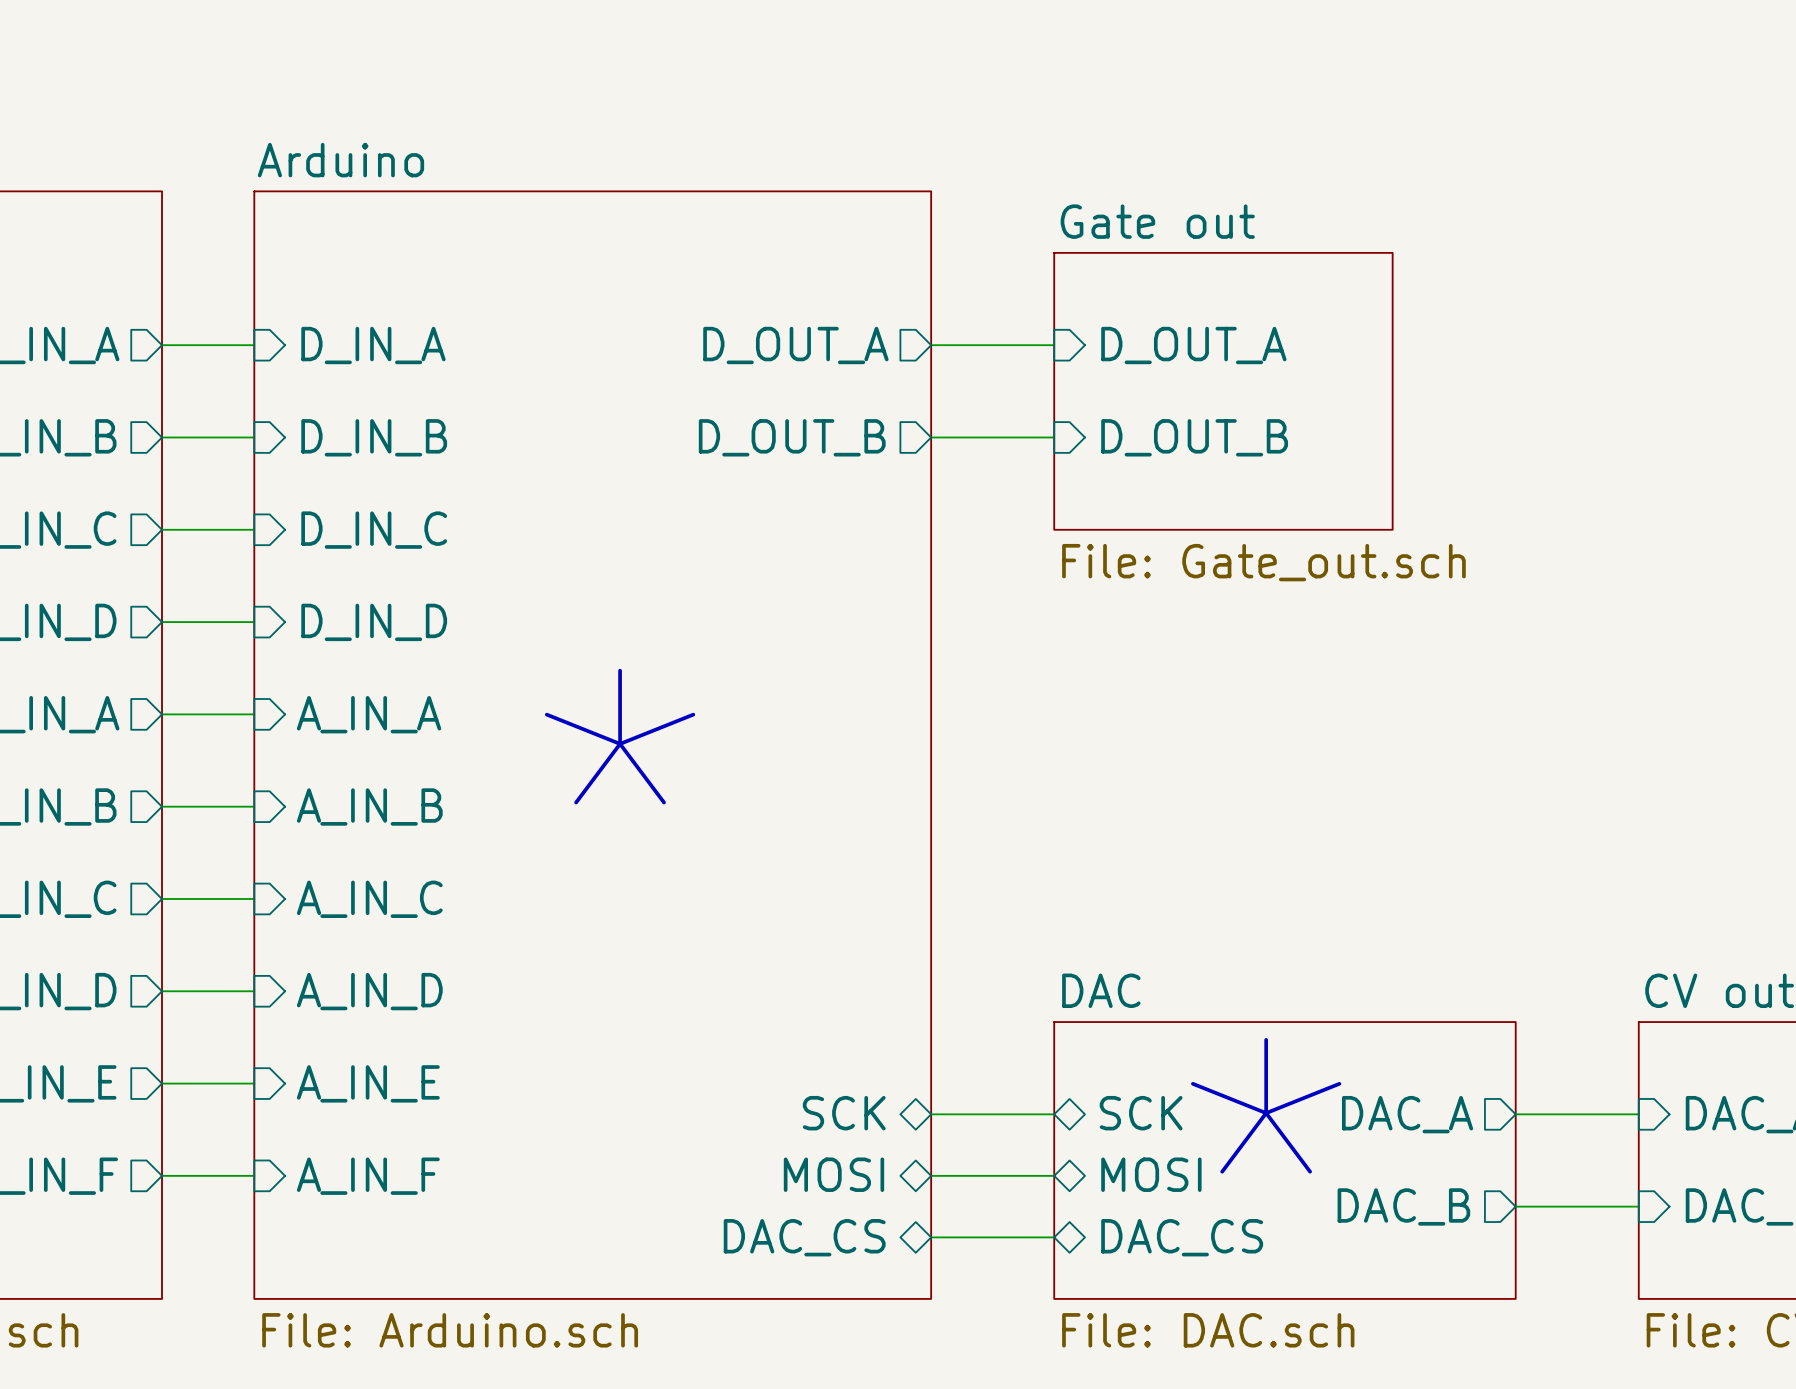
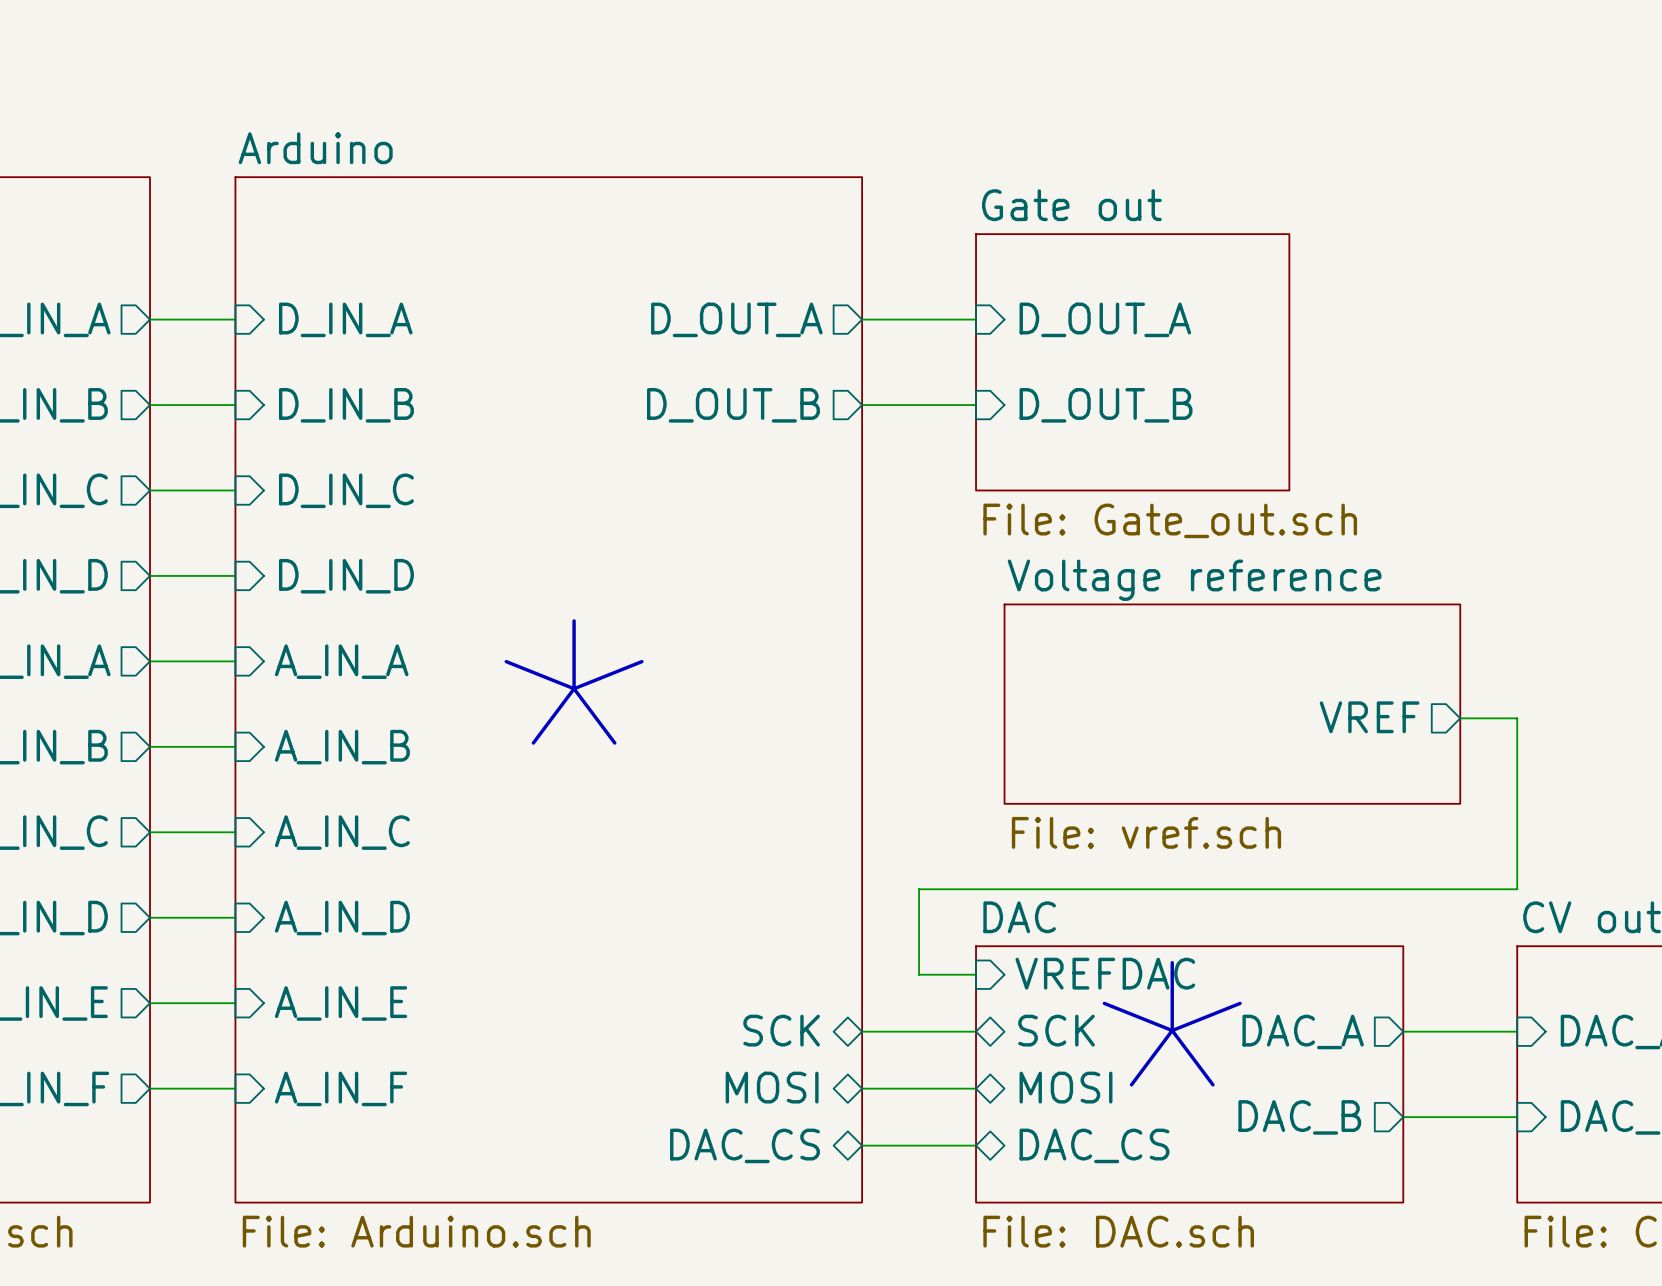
sheet Voltage reference: none -> File: vref.sch (1232, 704)
sheet pin: none -> VREF (1369, 717)
wire: none -> (1460, 718) (1517, 718) (1517, 889) (919, 889) (919, 974) (976, 974)
sheet pin: none -> VREFDAC (1105, 973)

